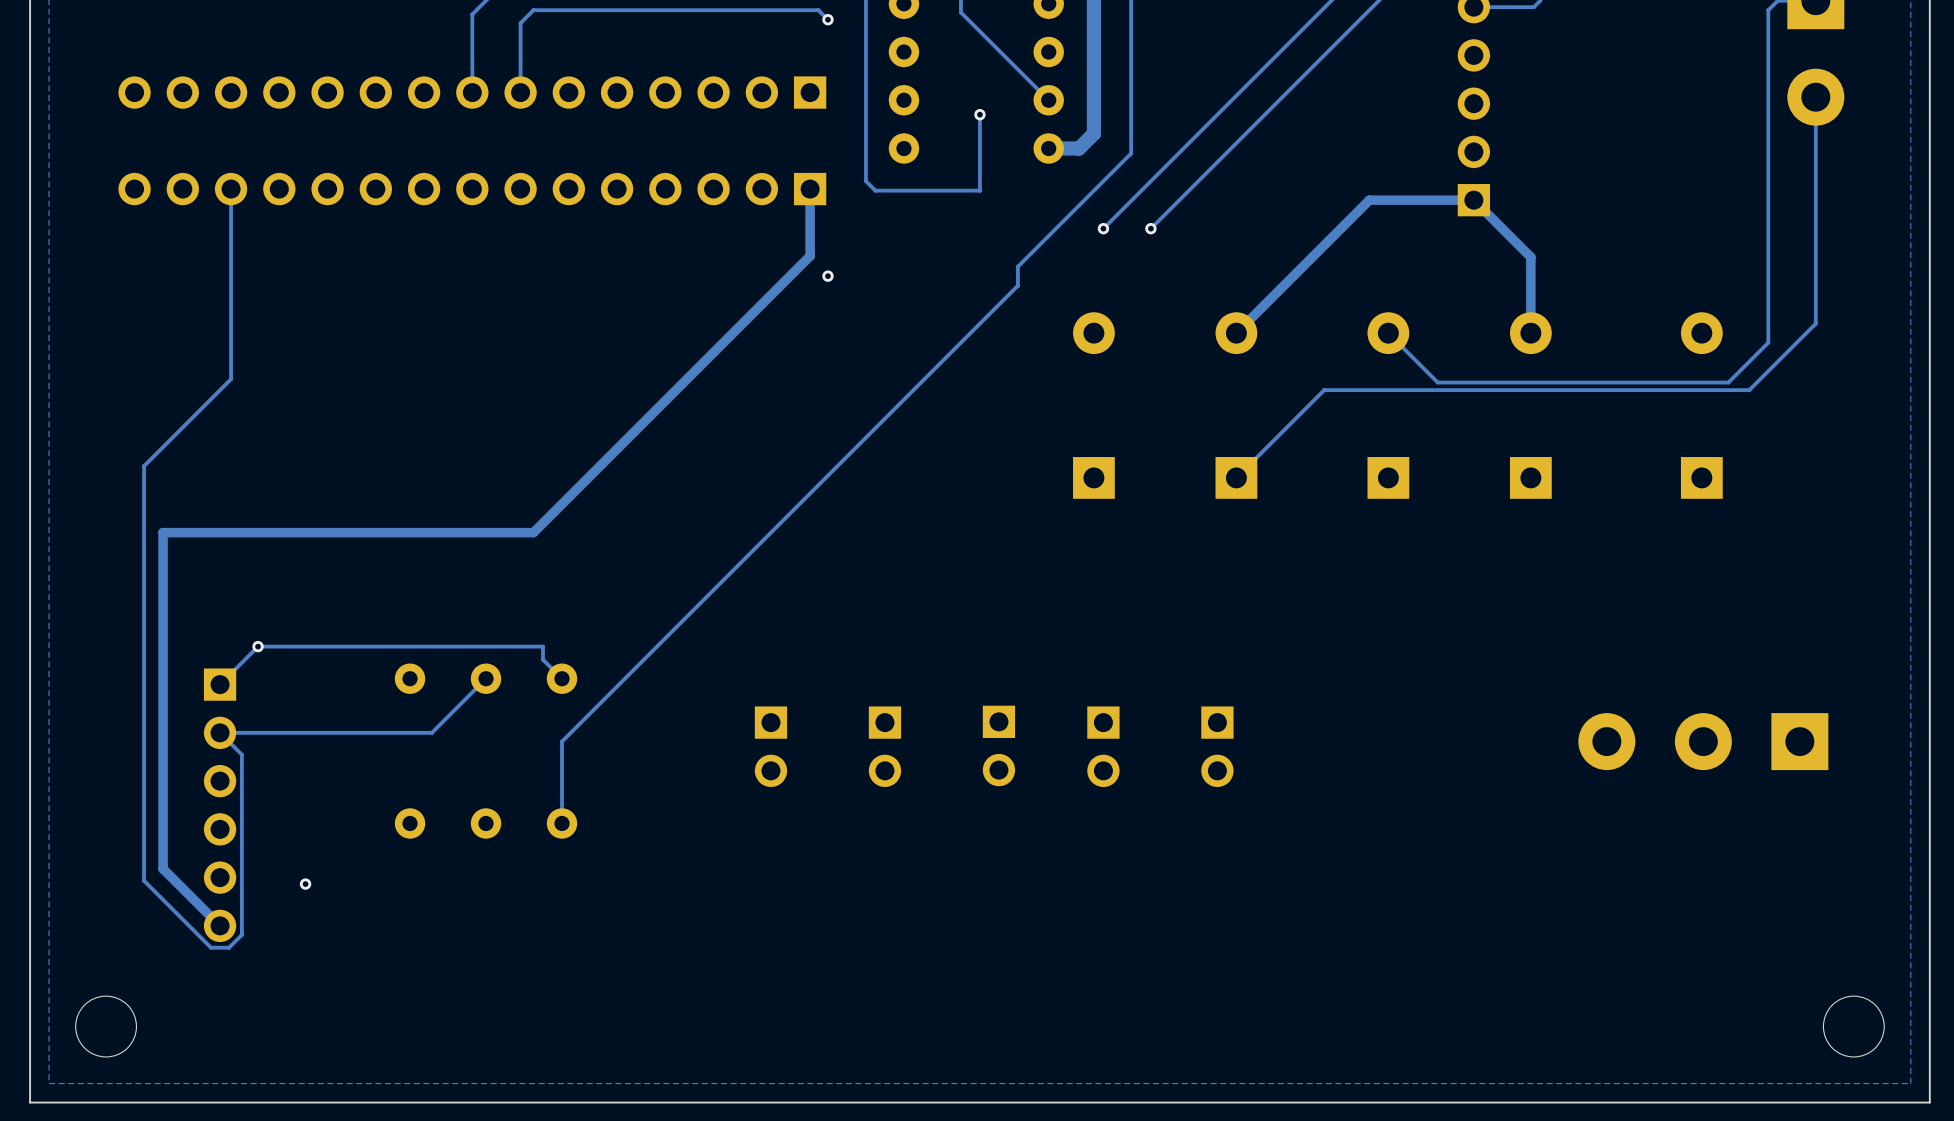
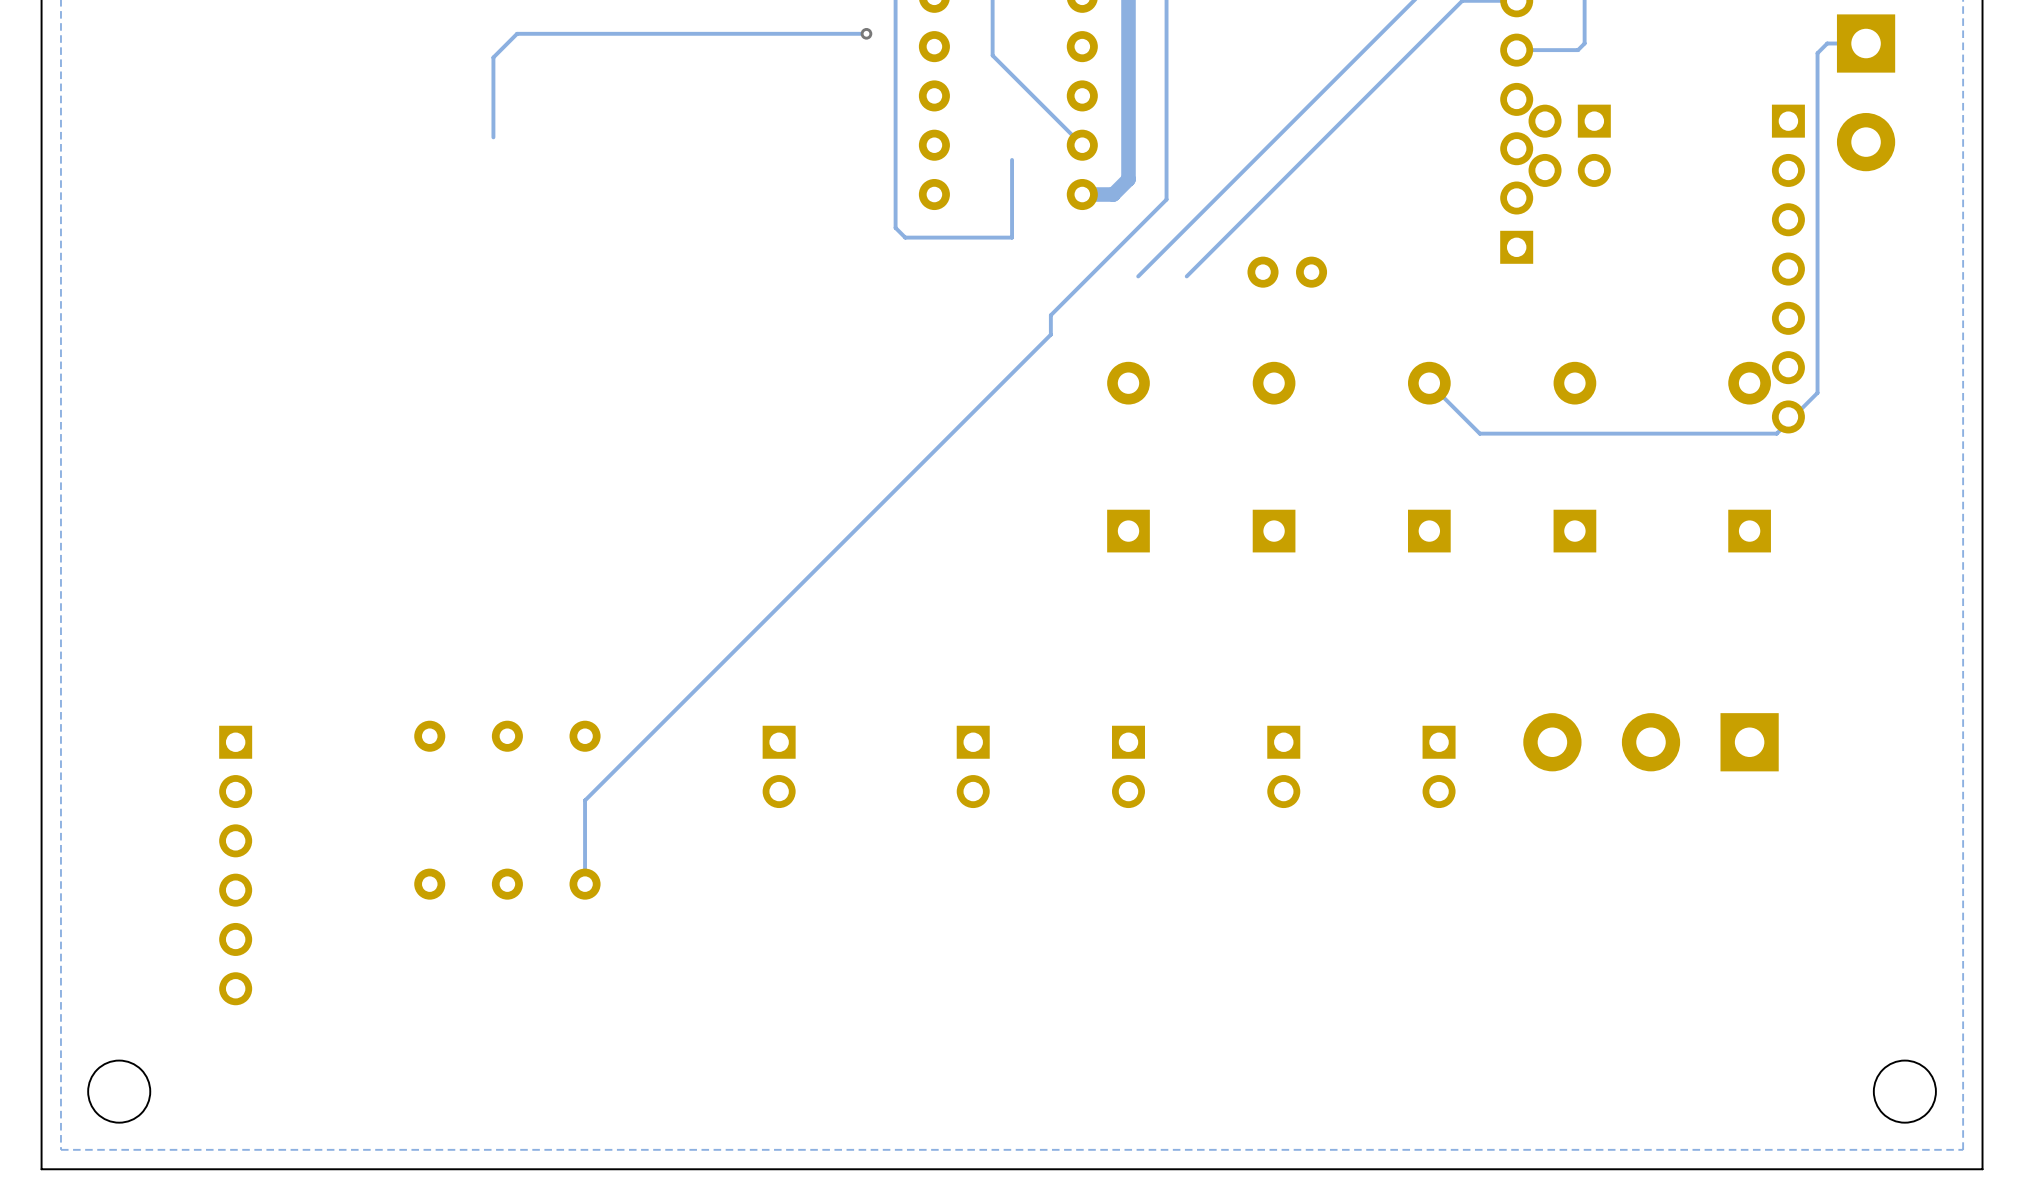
track: (827, 19) (818, 10) (533, 10) (520, 23) (520, 92) -> none
via: (827, 19) -> none
part: (472, 92) -> none
track: (1815, 97) (1815, 323) (1749, 390) (1324, 390) (1236, 477) -> none
part: none -> (1569, 145)
via: (979, 114) -> none
track: (231, 189) (231, 379) (144, 466) (144, 880) (211, 947) (229, 947) (241, 934) (241, 754) (220, 732) (431, 732) (486, 678) -> none
part: (472, 189) -> none
track: (810, 189) (810, 256) (533, 532) (163, 532) (163, 868) (220, 925) -> none
part: none -> (1788, 269)
part: none -> (1287, 272)
via: (1103, 228) -> none
via: (1150, 228) -> none
via: (827, 276) -> none
track: (1530, 333) (1530, 257) (1473, 200) (1369, 200) (1236, 333) -> none
via: (258, 646) -> none
track: (562, 678) (543, 659) (543, 646) (258, 646) (220, 684) -> none
part: none -> (973, 766)
part: none -> (1439, 766)
part position: (1703, 741) -> (1651, 742)
part: (998, 745) -> none
part position: (770, 746) -> (779, 766)
part: (884, 746) -> none
part position: (1103, 746) -> (1128, 766)
part position: (1217, 746) -> (1283, 766)
via: (305, 884) -> none

